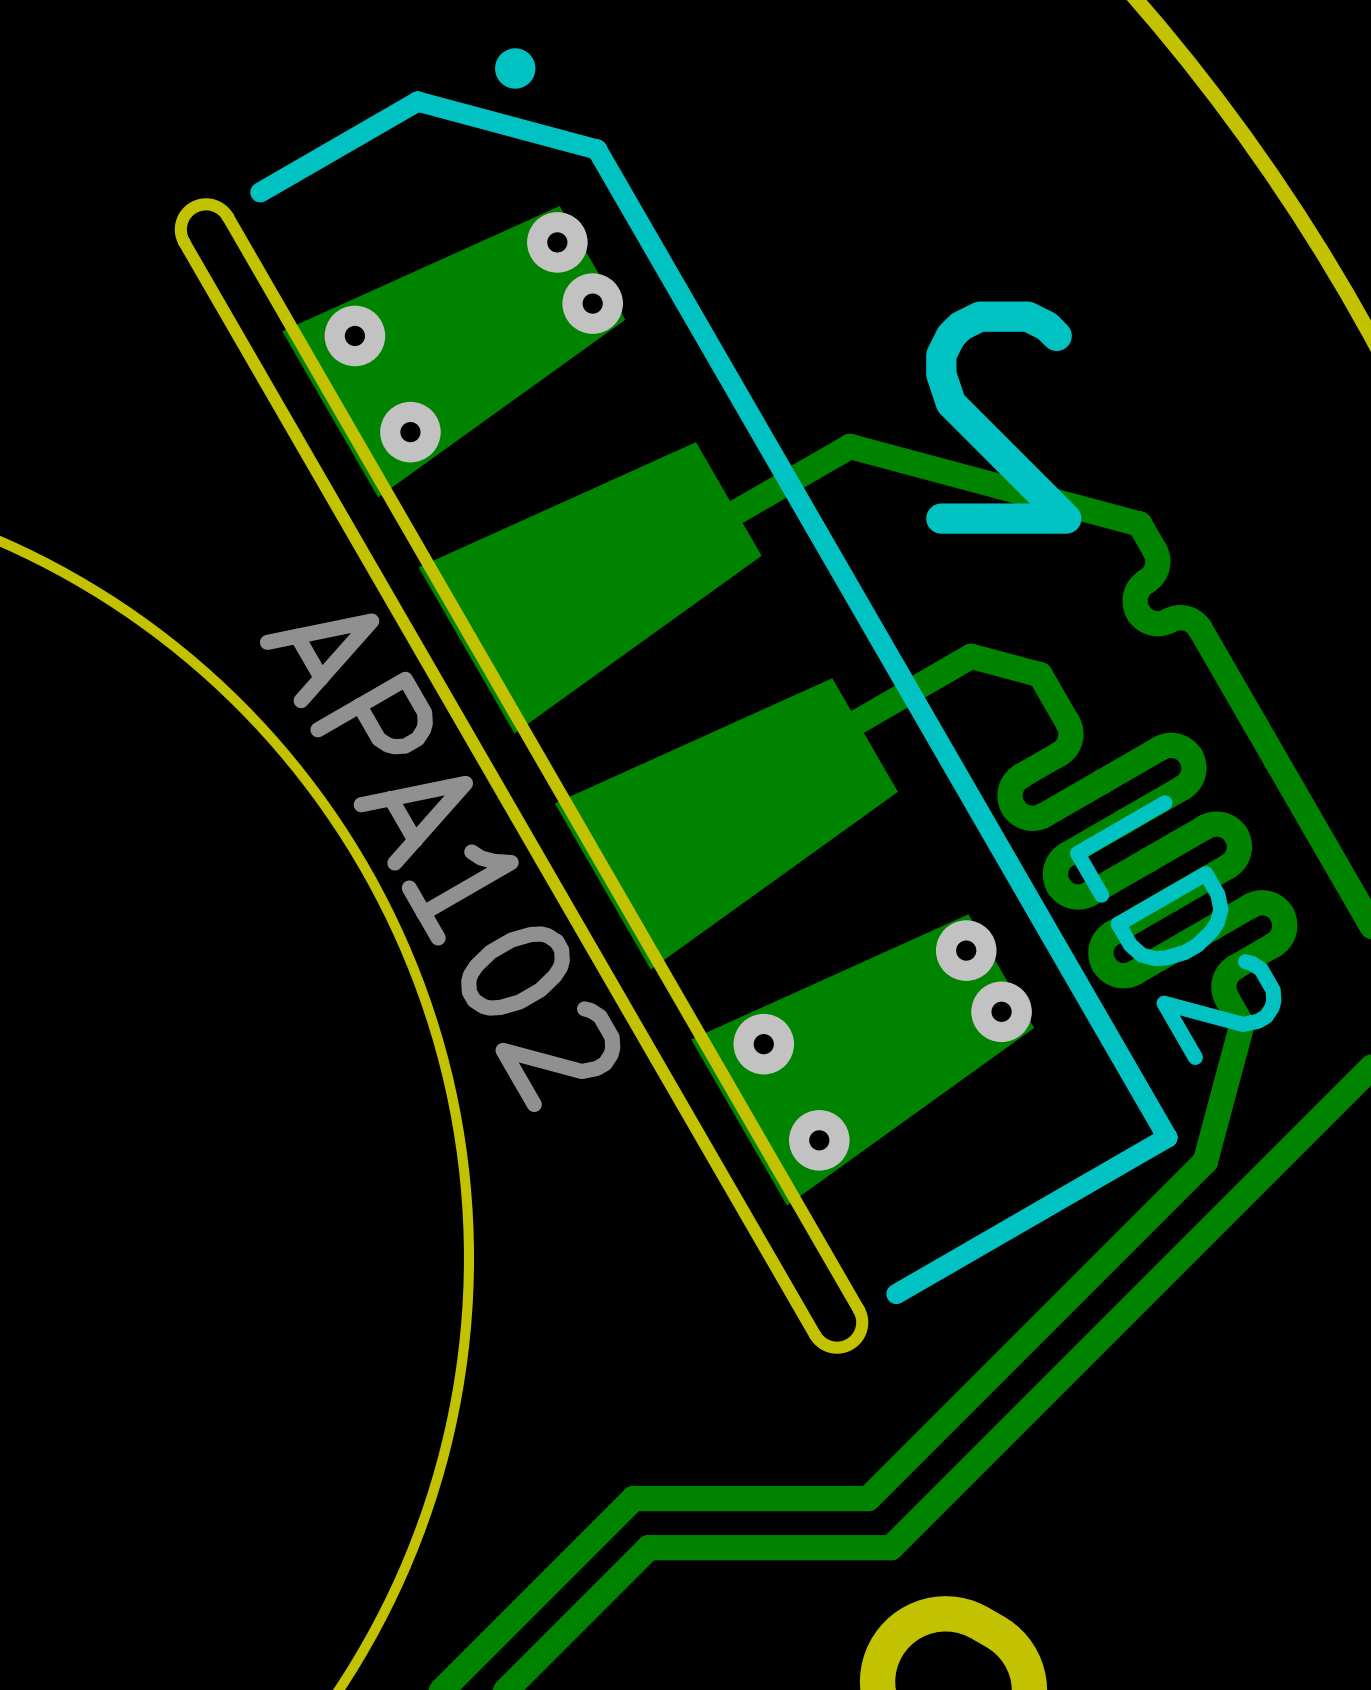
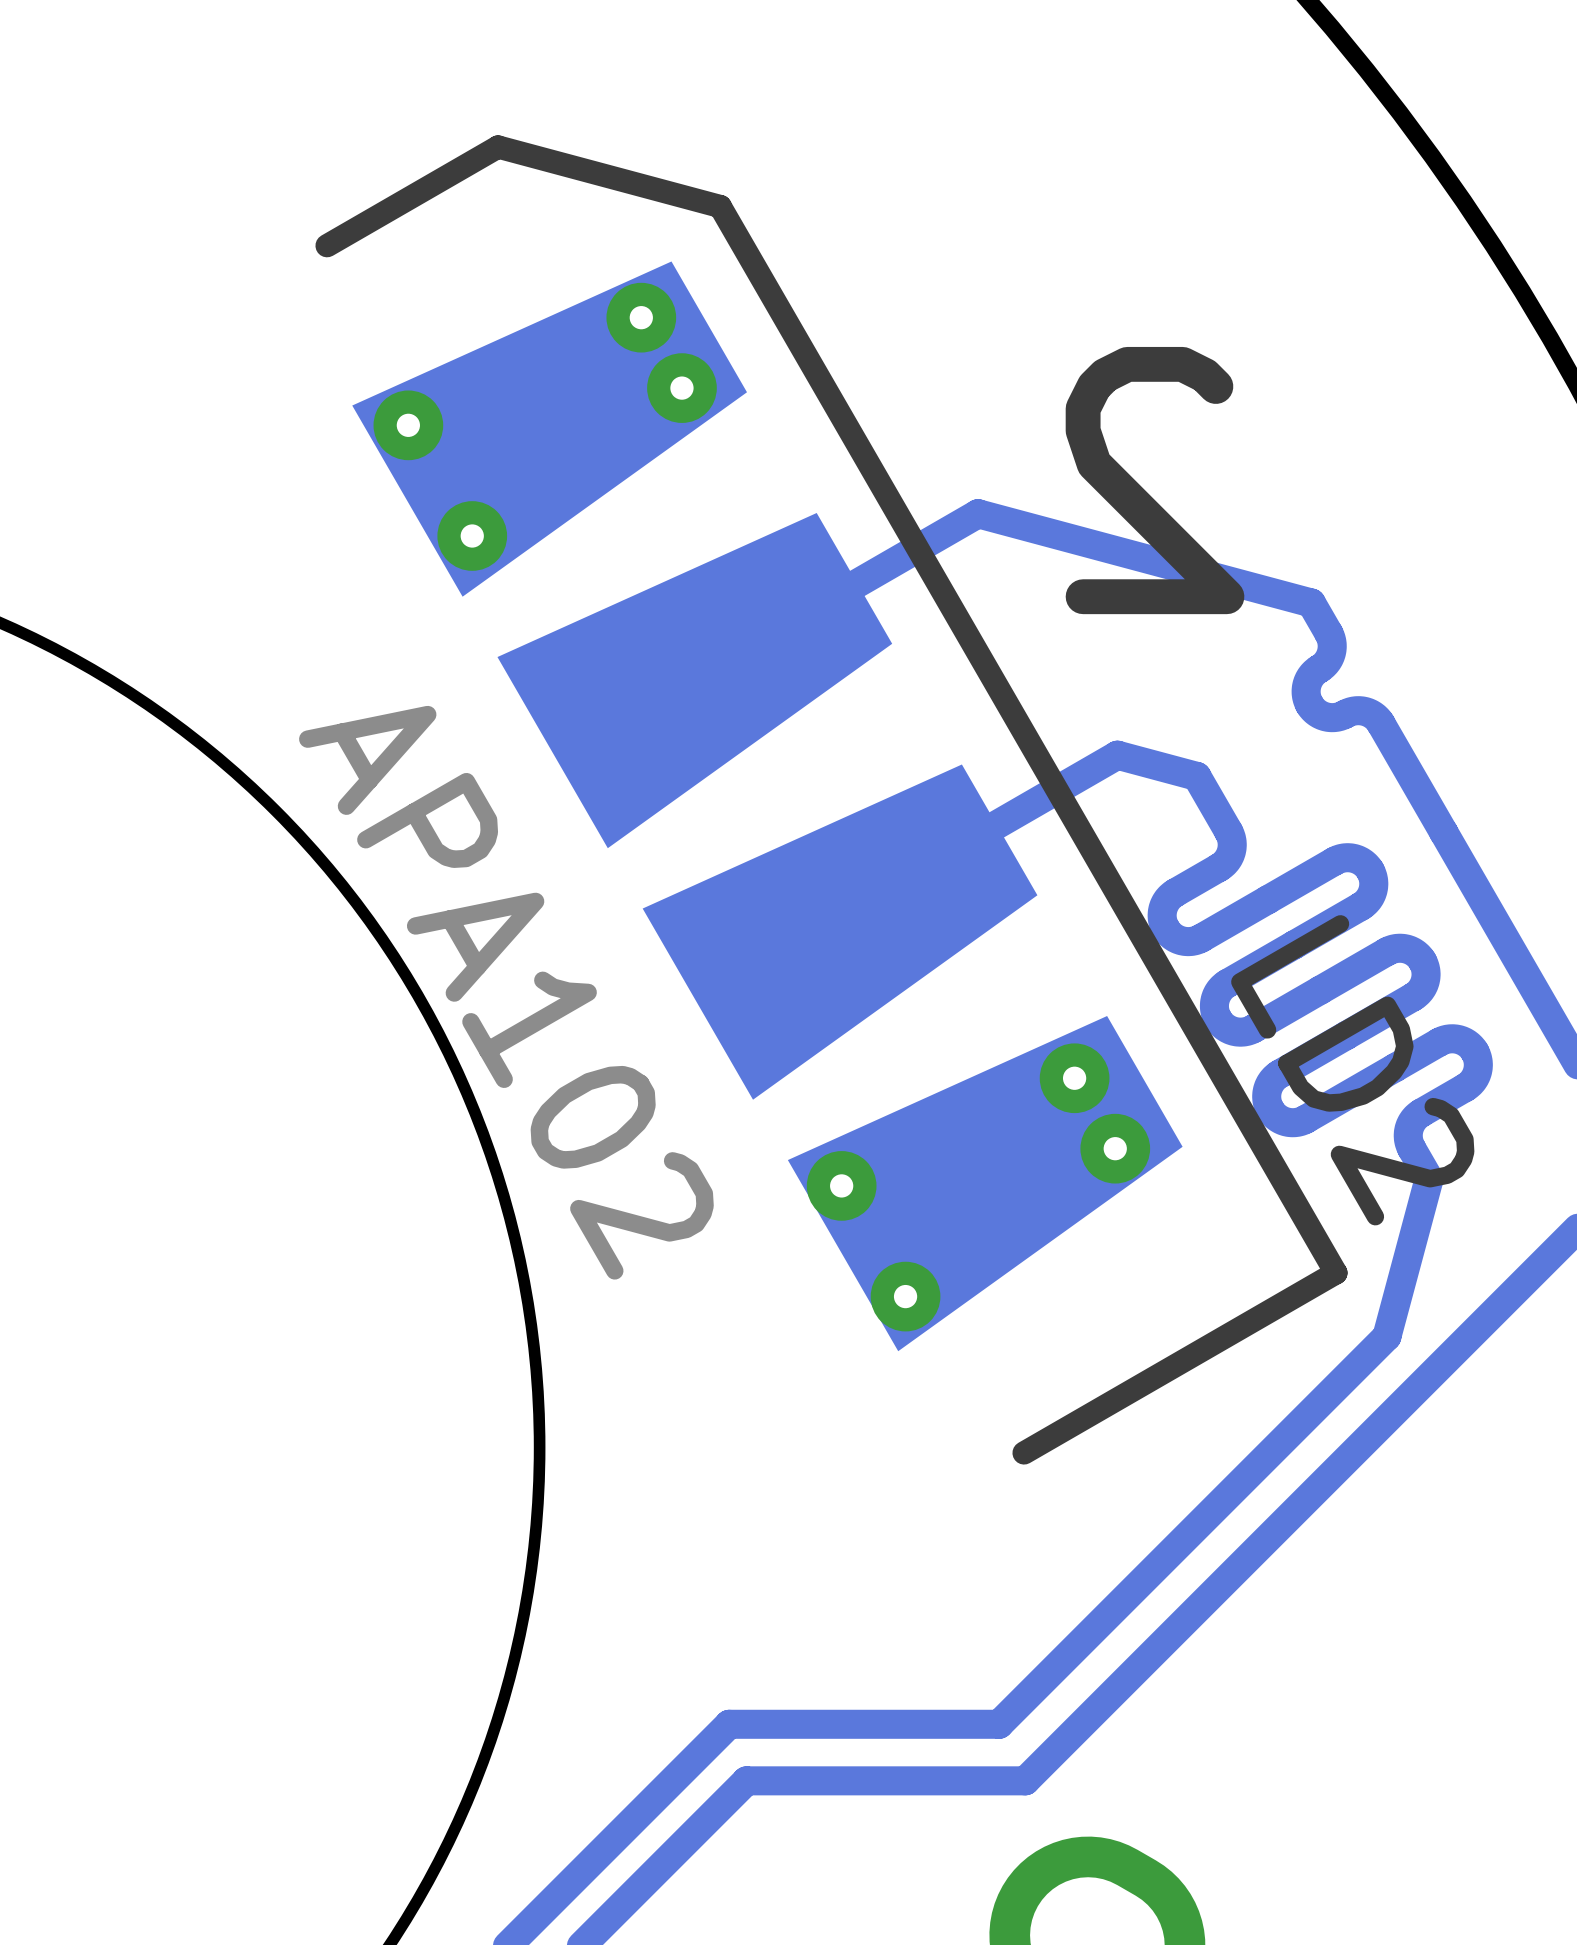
LD2 footprint: [174, 48, 1178, 1354] -> [315, 135, 1348, 1465]
via: (557, 242) -> none
via: none -> (641, 317)
via: (592, 303) -> none
via position: (354, 335) -> (408, 425)
via: none -> (681, 388)
via position: (410, 432) -> (472, 536)
via: none -> (1074, 1078)
via: (966, 950) -> none
via: none -> (1115, 1148)
via: (1001, 1011) -> none
via position: (763, 1044) -> (841, 1185)
via position: (819, 1140) -> (905, 1296)

